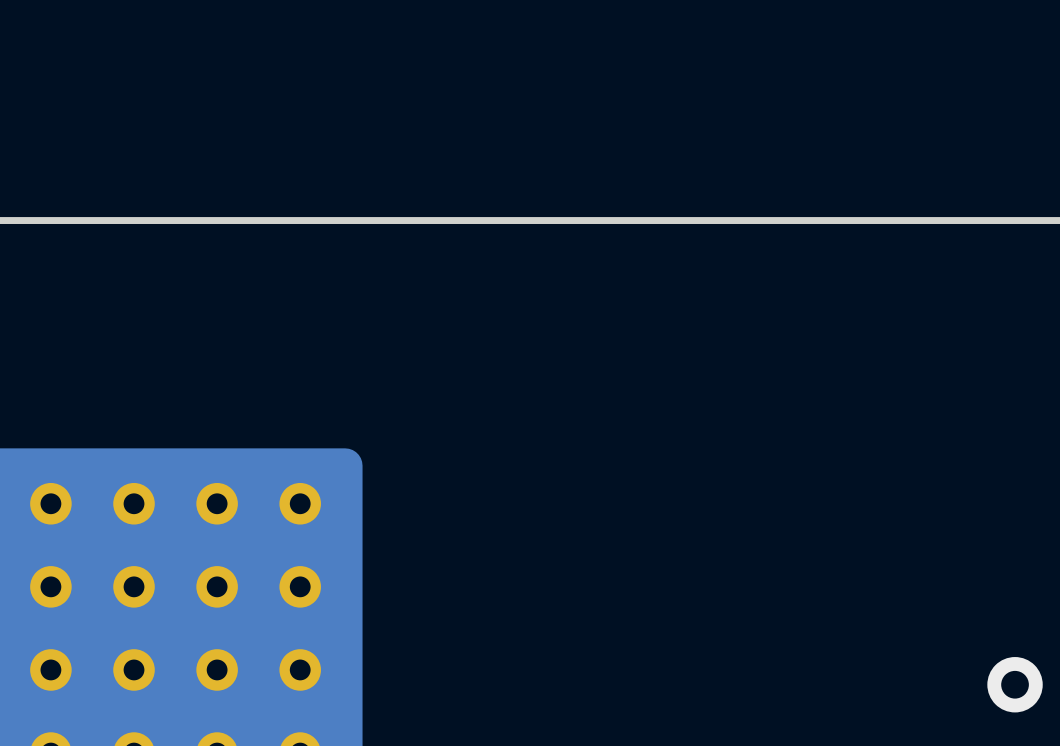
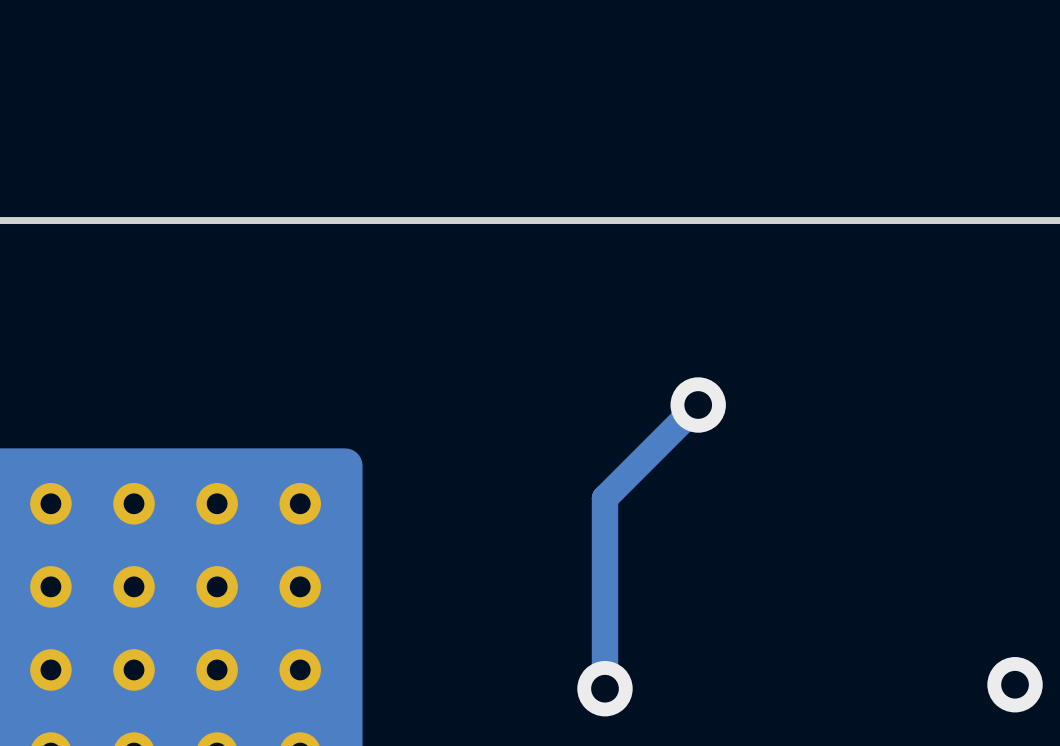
track: none -> (698, 405) (604, 498) (604, 688)
via: none -> (698, 405)
via: none -> (604, 688)

